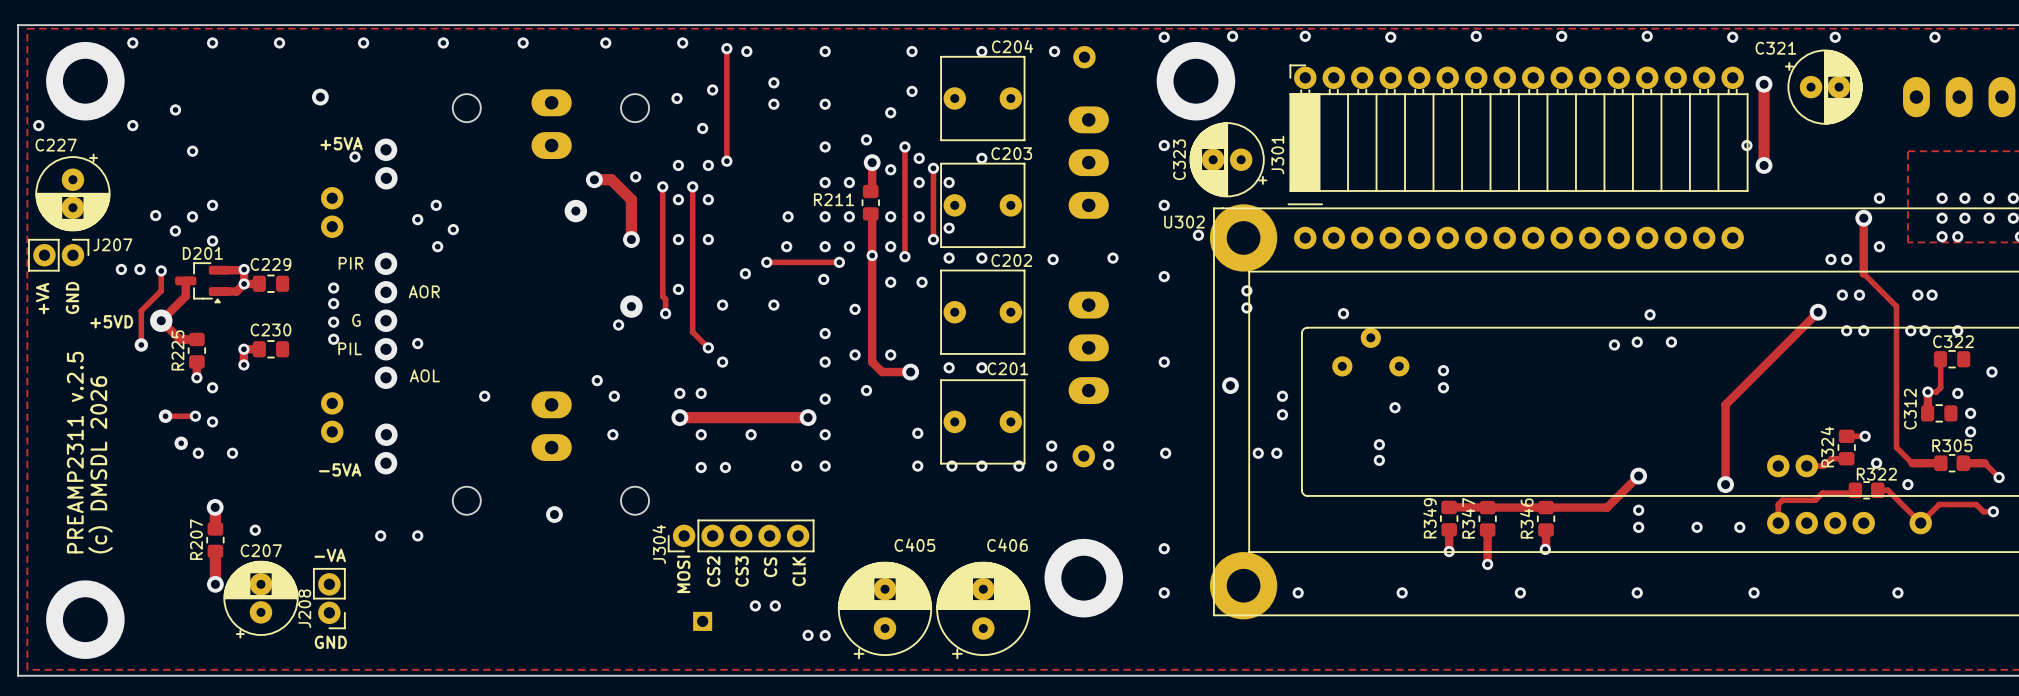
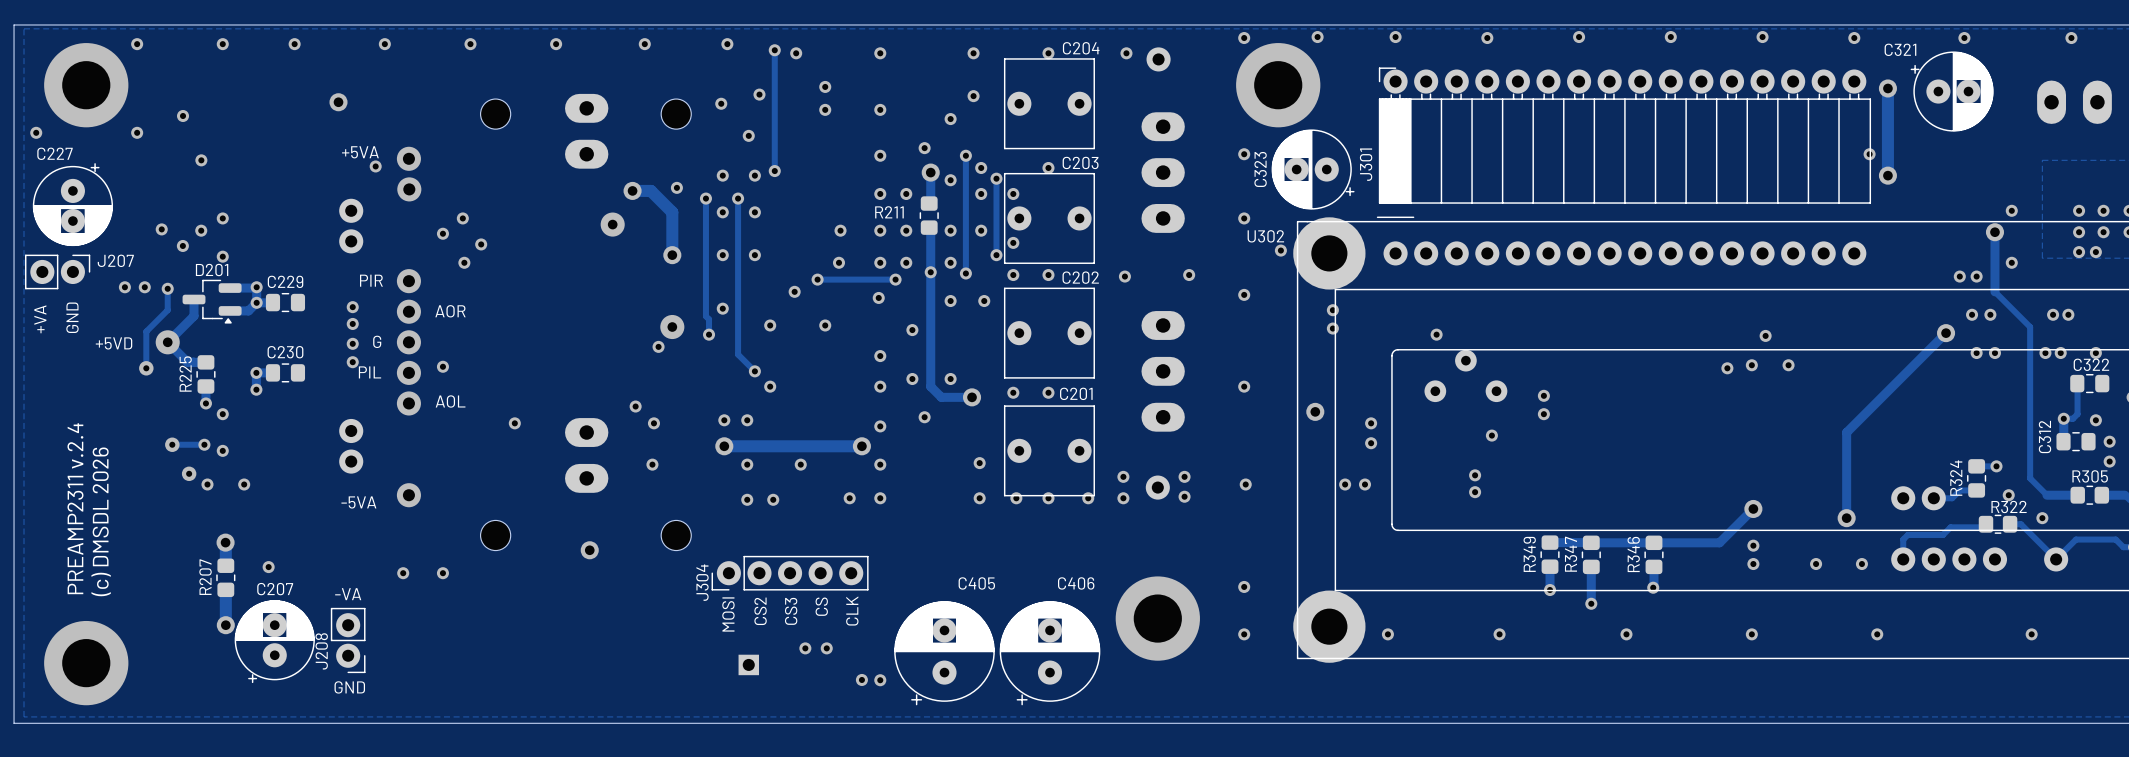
via: (386, 434) -> none
text: PREAMP2311 v.2.5 (75, 452) -> PREAMP2311 v.2.4 (75, 508)

